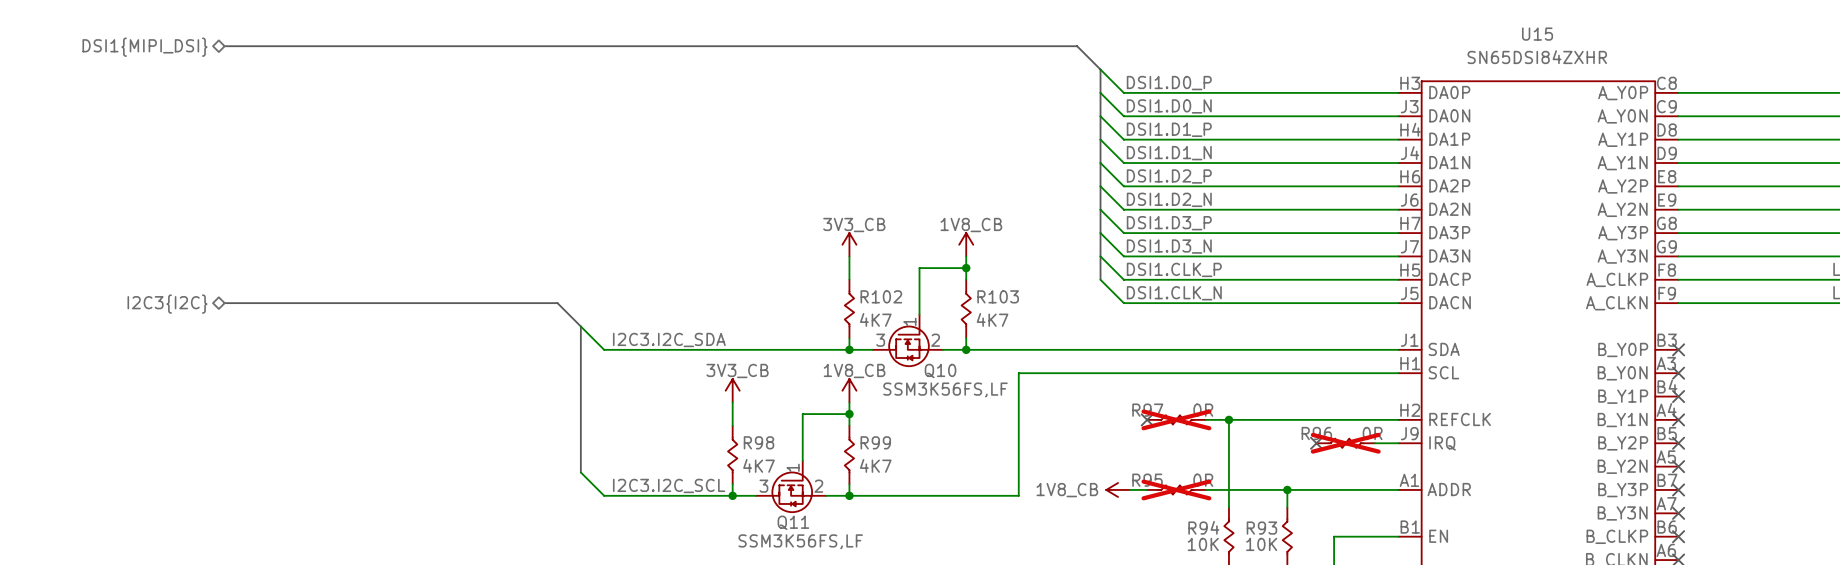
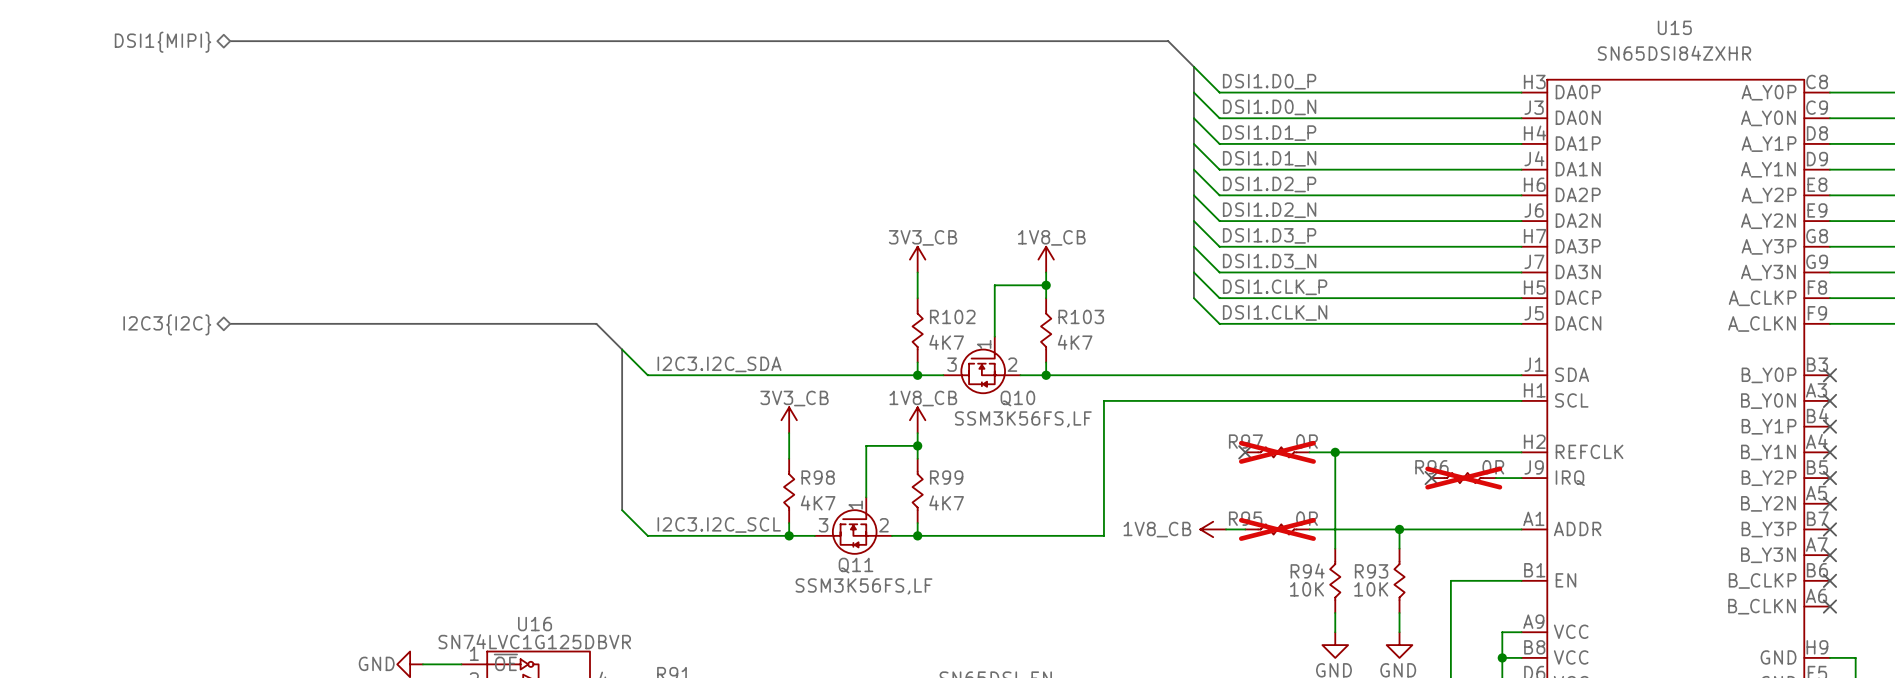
hierarchical label: DSI1{MIPI_DSI} (144, 47) -> DSI1{MIPI} (163, 42)

